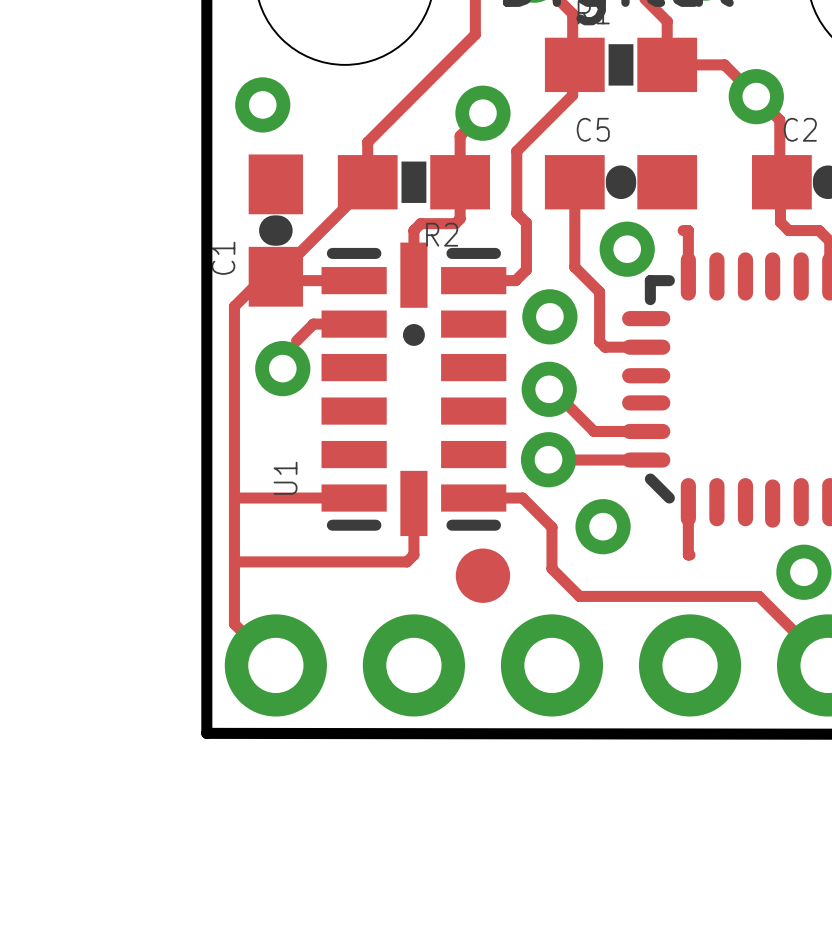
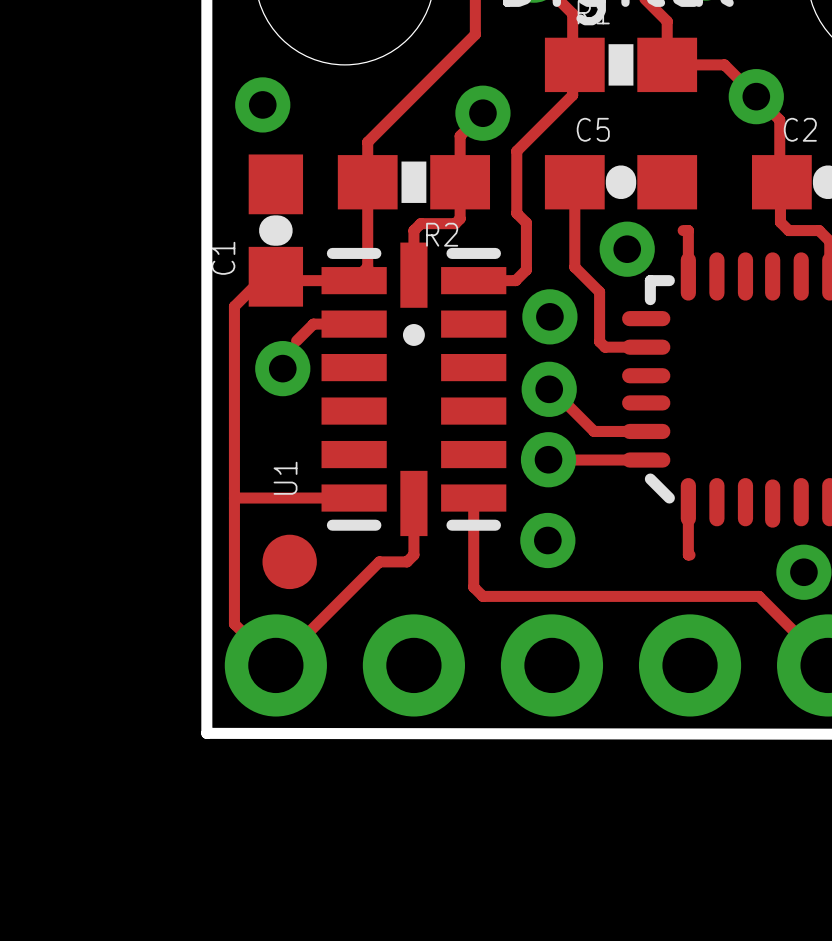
track: (367, 184) (275, 276) -> (367, 184) (367, 267) (354, 280)
track: (473, 498) (522, 498) (551, 527) (551, 568) (579, 596) -> (473, 498) (473, 587) (482, 596) (579, 596)
via position: (603, 526) -> (547, 540)
track: (234, 561) (379, 561) -> (275, 665) (379, 561)
part position: (482, 575) -> (289, 561)

